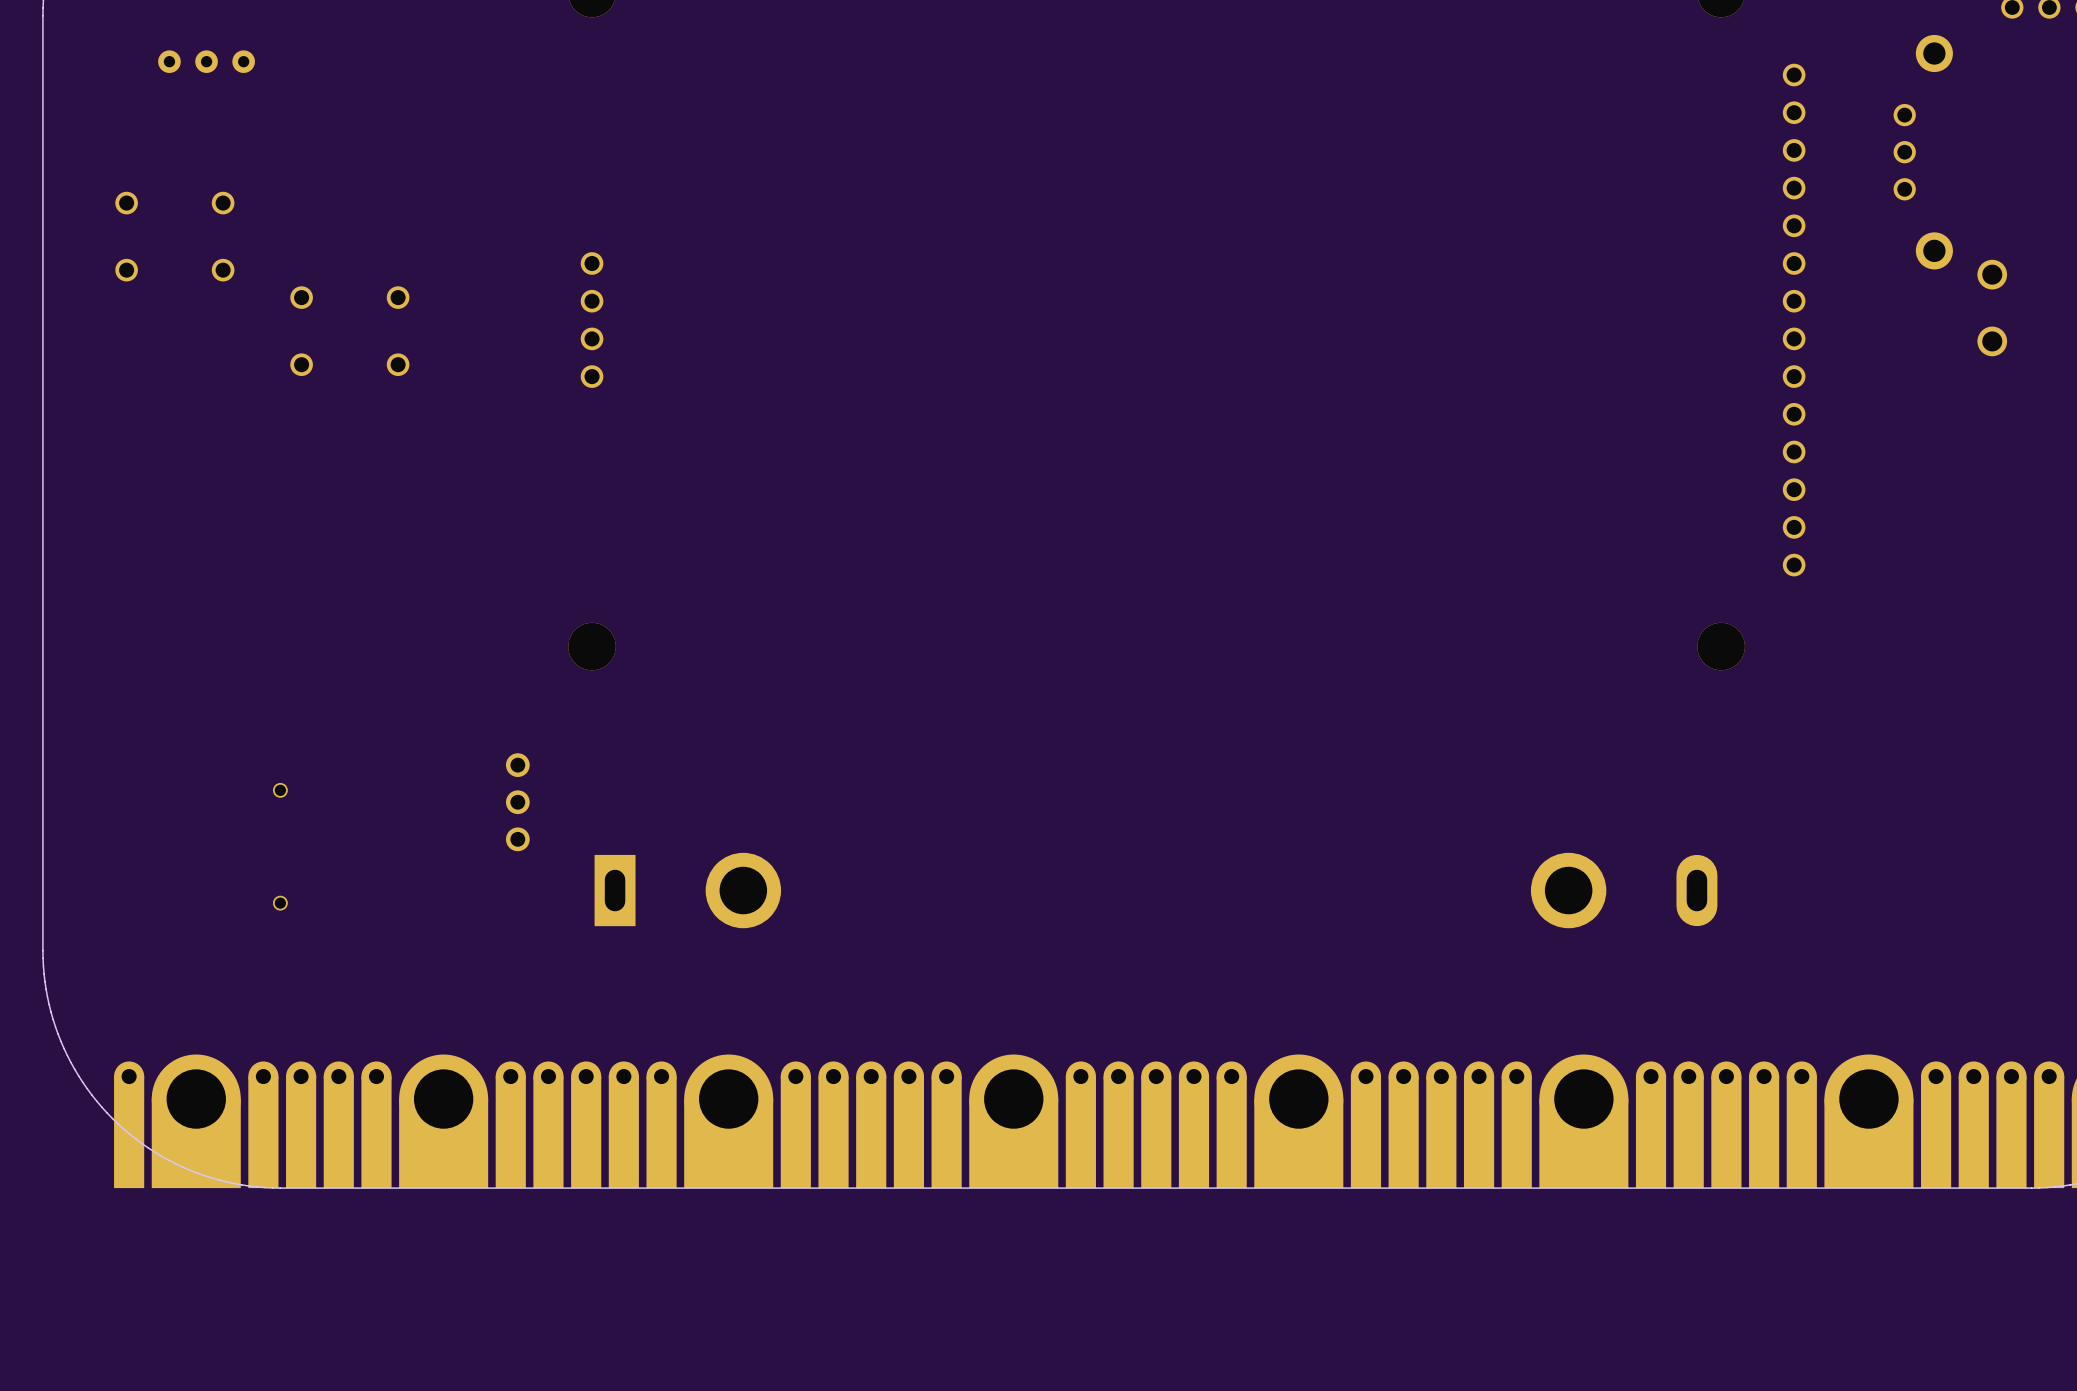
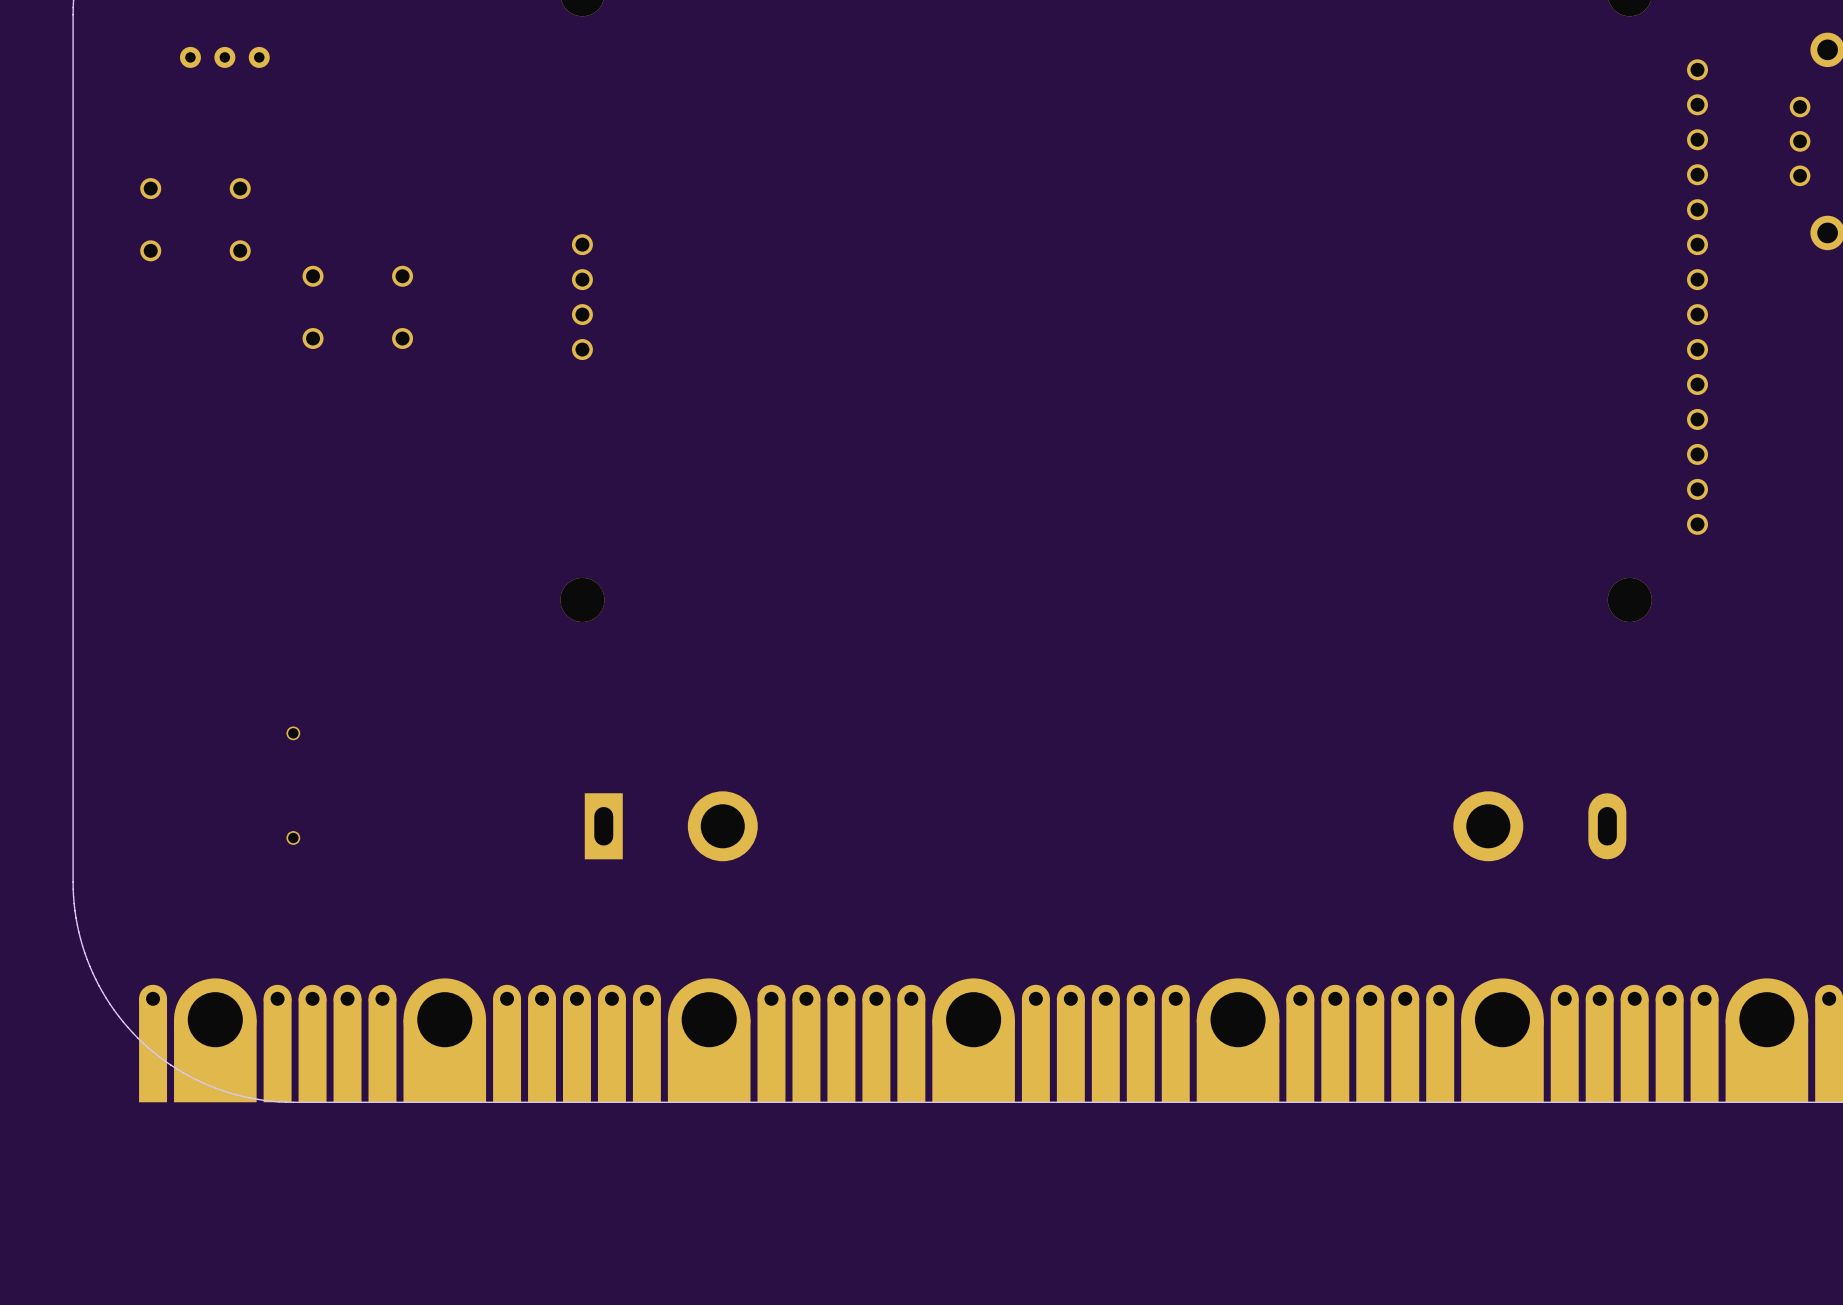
part: (517, 802) -> none

